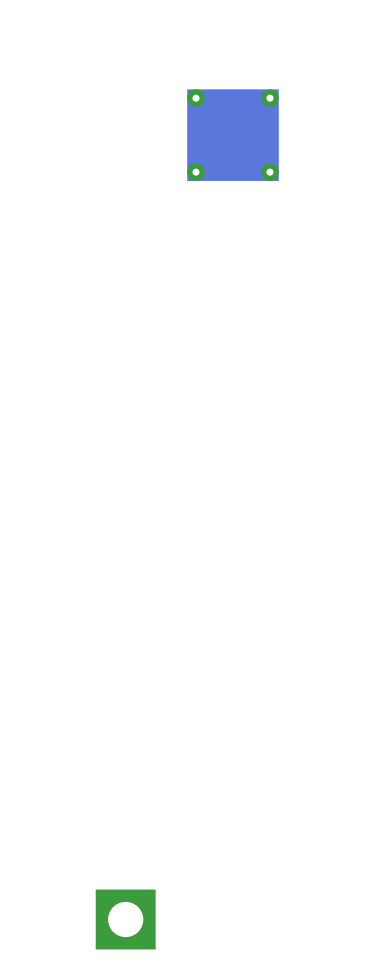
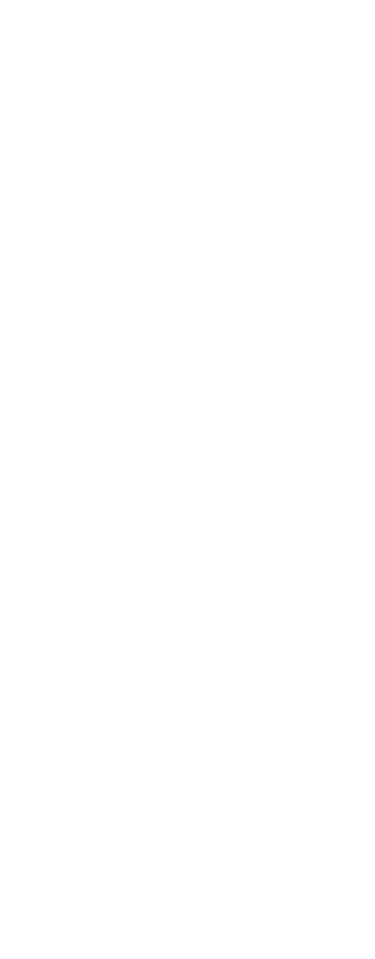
part: (232, 135) -> none
part: (125, 919) -> none

